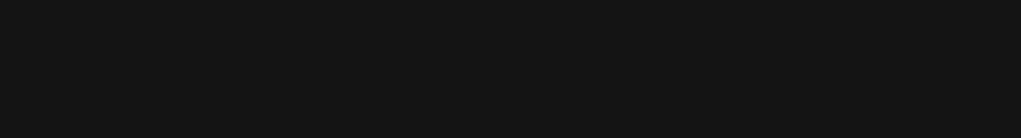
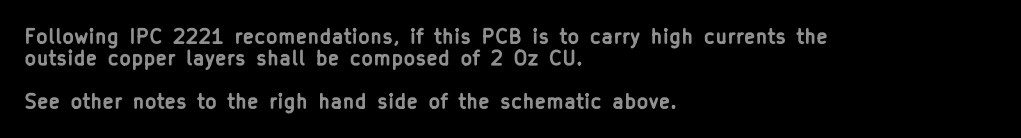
text: none -> Following IPC 2221 recomendations, if this PCB is to carry high currents the (426, 38)
text: none -> outside copper layers shall be composed of 2 Oz CU. (303, 59)
text: none -> See other notes to the righ hand side of the schematic above. (350, 103)

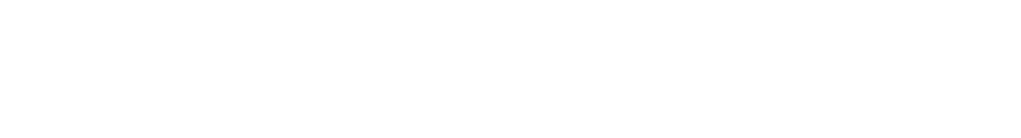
text: Following IPC 2221 recomendations, if this PCB is to carry high currents the (426, 38) -> none
text: outside copper layers shall be composed of 2 Oz CU. (303, 59) -> none
text: See other notes to the righ hand side of the schematic above. (350, 103) -> none

